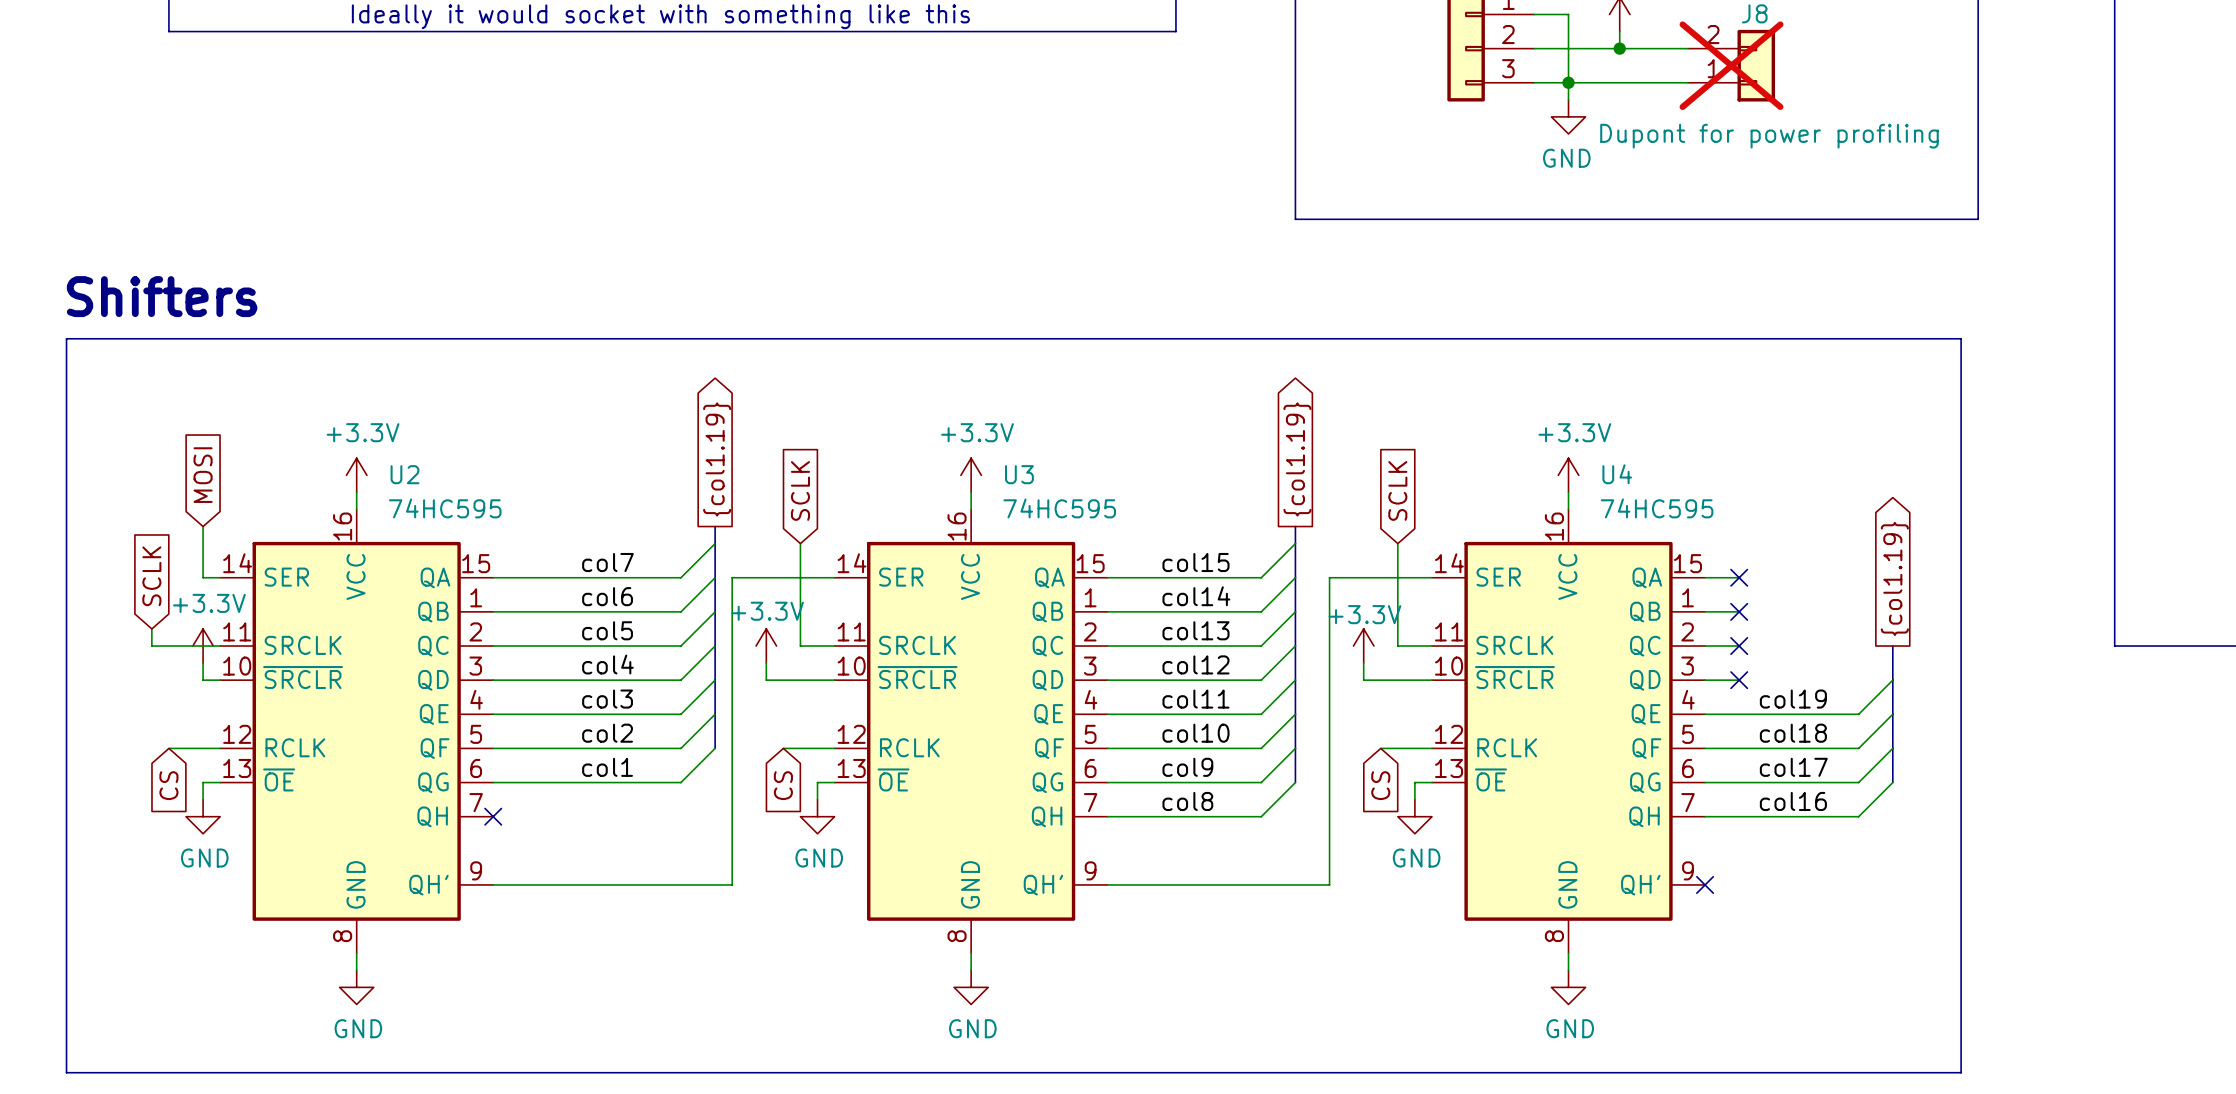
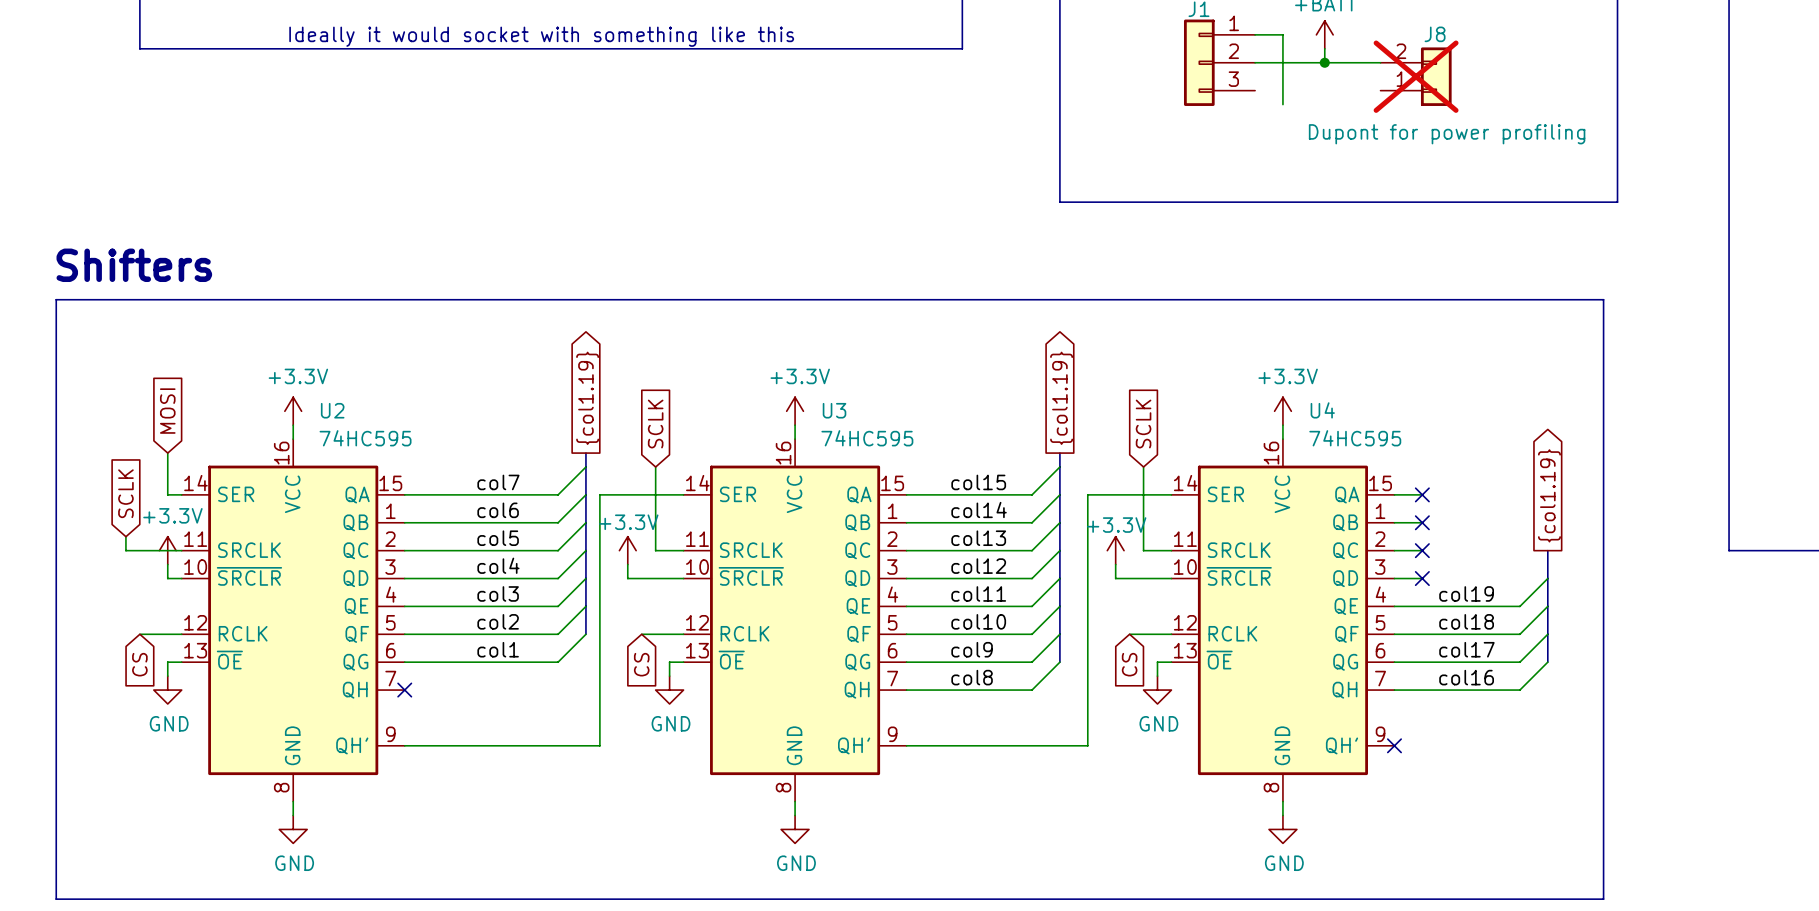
wire: (1534, 82) (1687, 82) -> none
junction: (1568, 82) -> none
power symbol: GND (1568, 116) -> none

